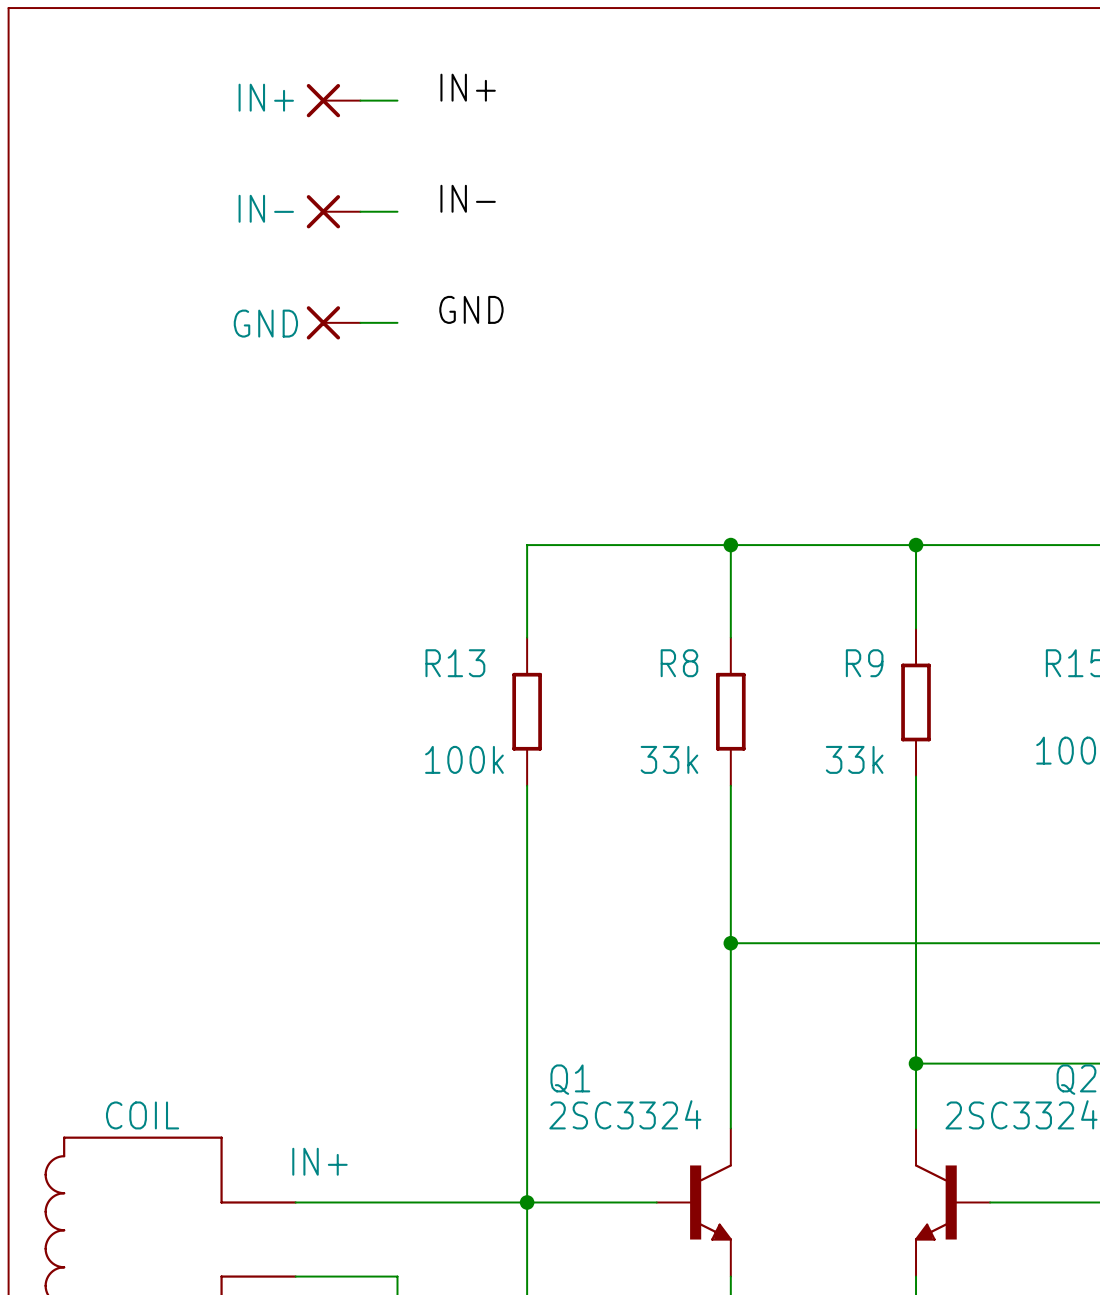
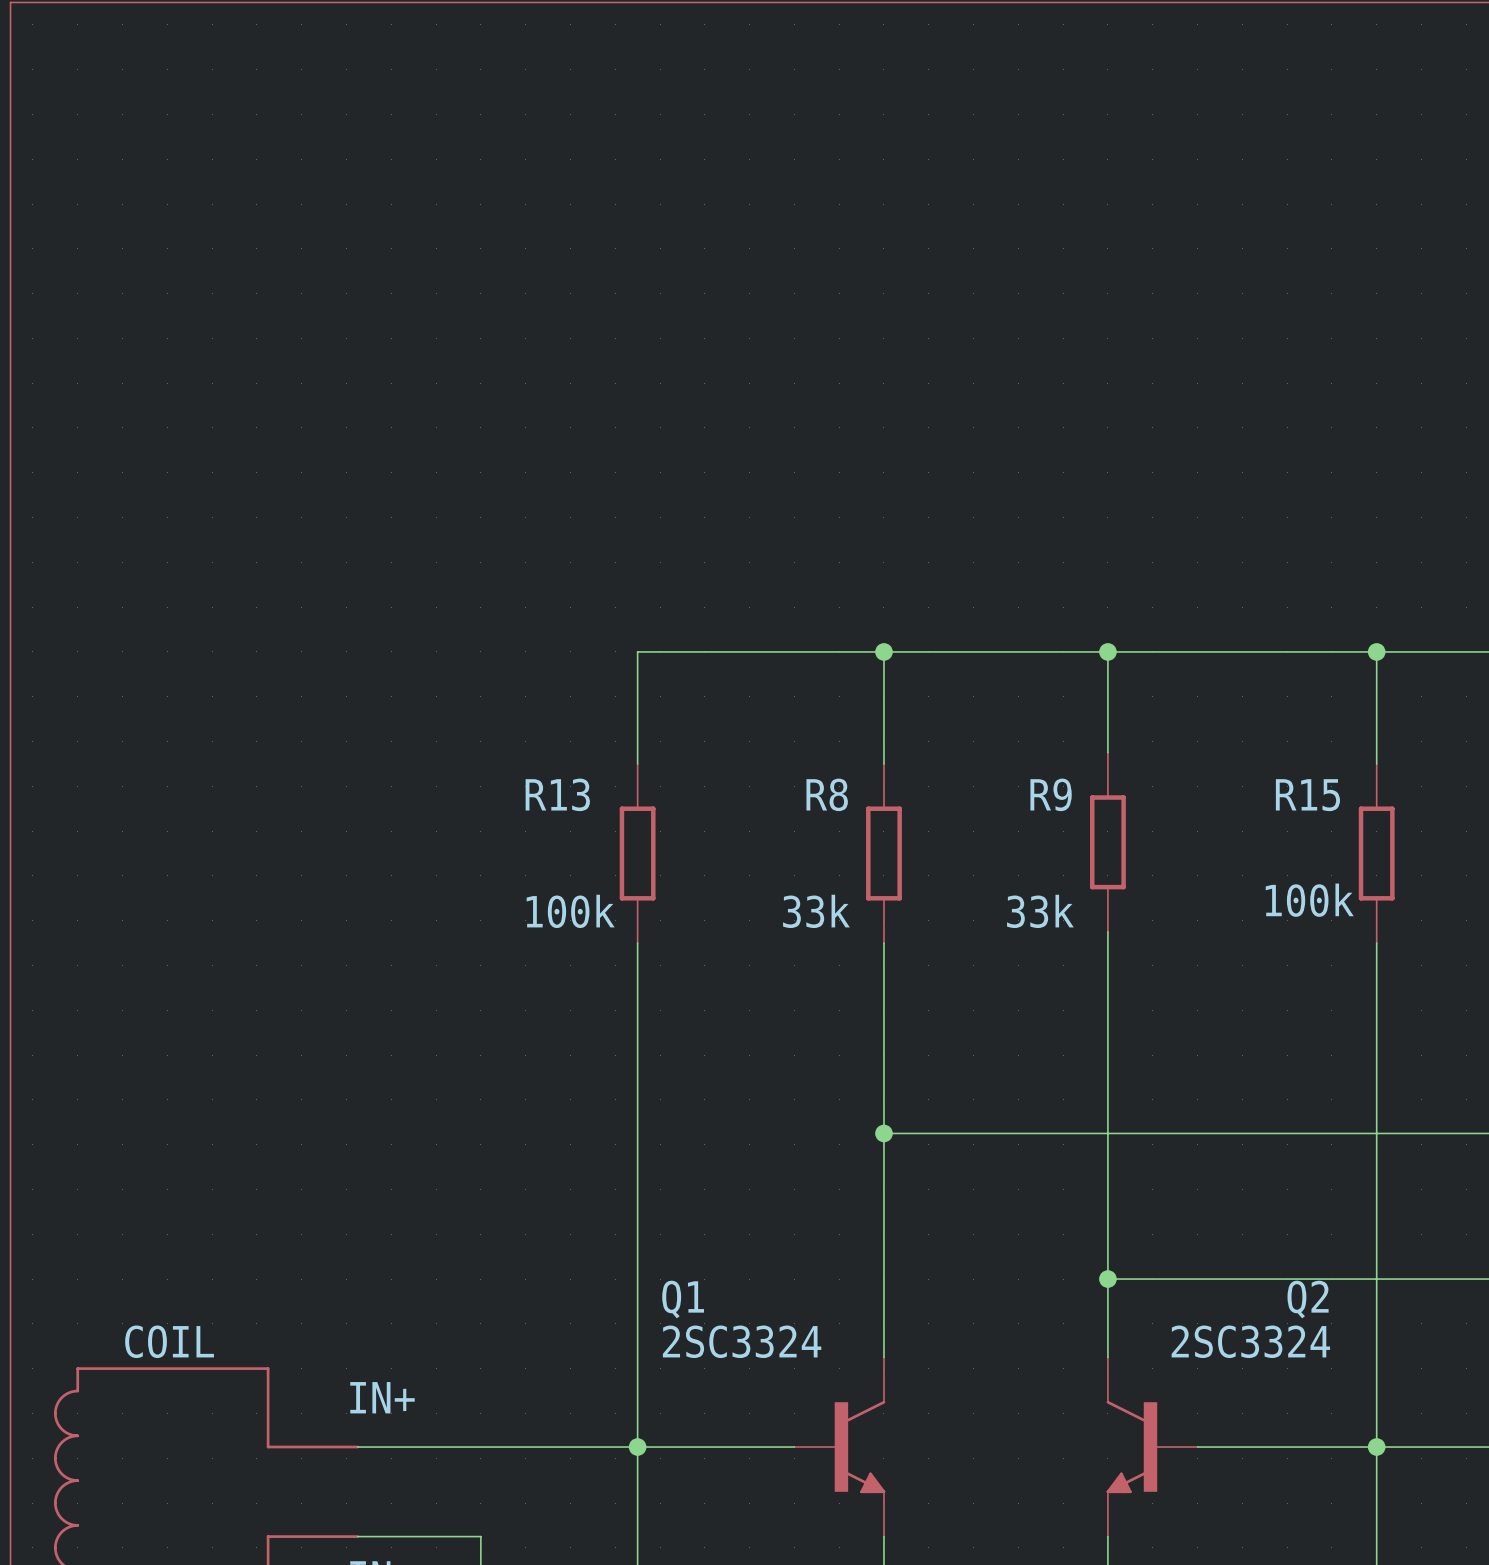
label: IN+ (468, 87) -> none
IN+: (333, 100) -> none
wire: (360, 100) (397, 100) -> none
label: IN- (468, 198) -> none
IN-: (333, 211) -> none
wire: (360, 211) (397, 211) -> none
label: GND (471, 309) -> none
GND: (333, 322) -> none
wire: (360, 322) (397, 322) -> none

